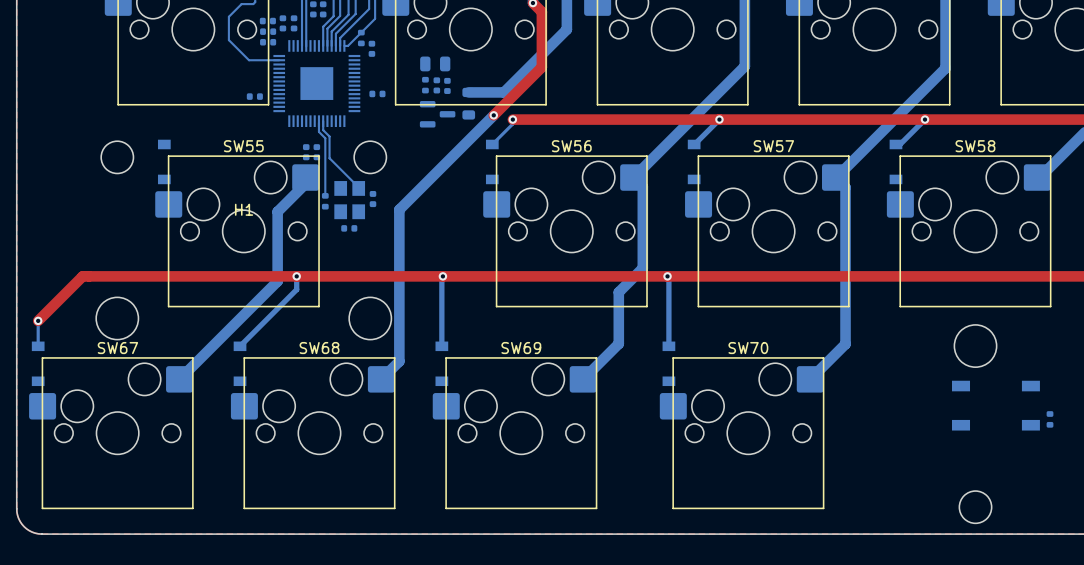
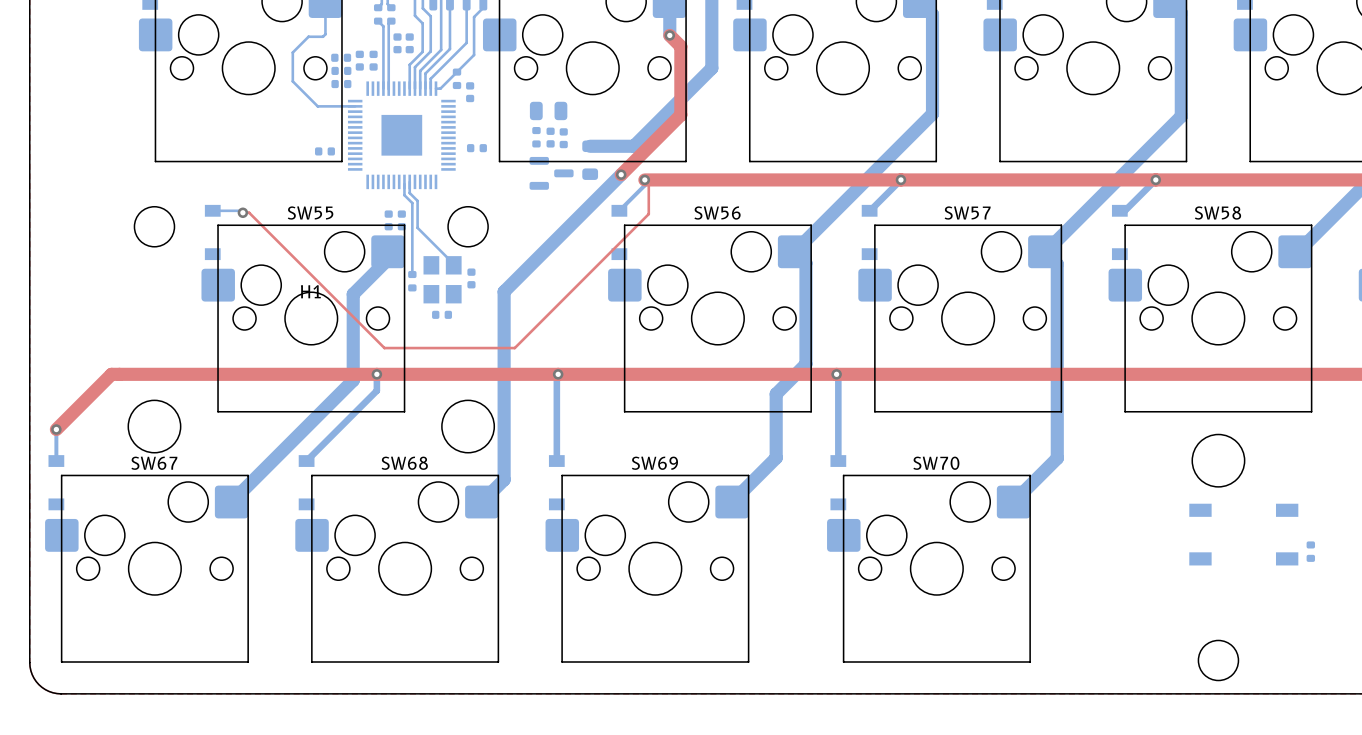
top track: none -> (644, 179) (648, 183) (648, 214) (514, 348) (384, 348) (249, 212) (242, 212)
bottom track: none -> (212, 210) (240, 210) (242, 212)
via: none -> (242, 212)

